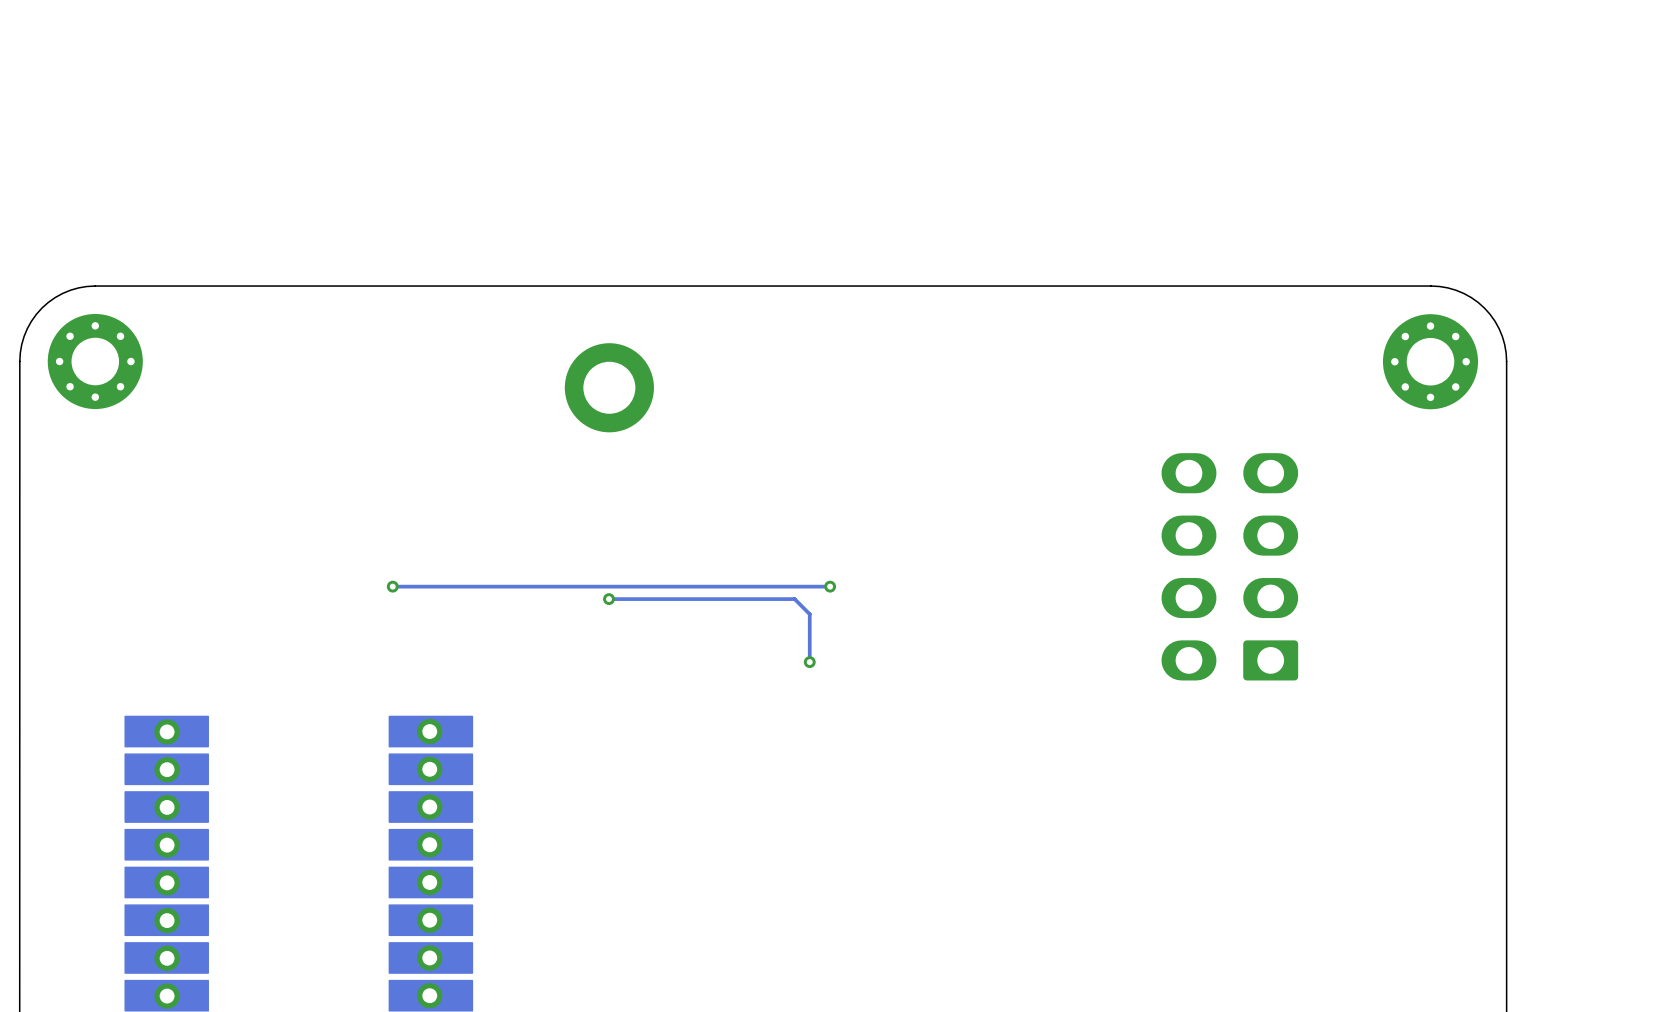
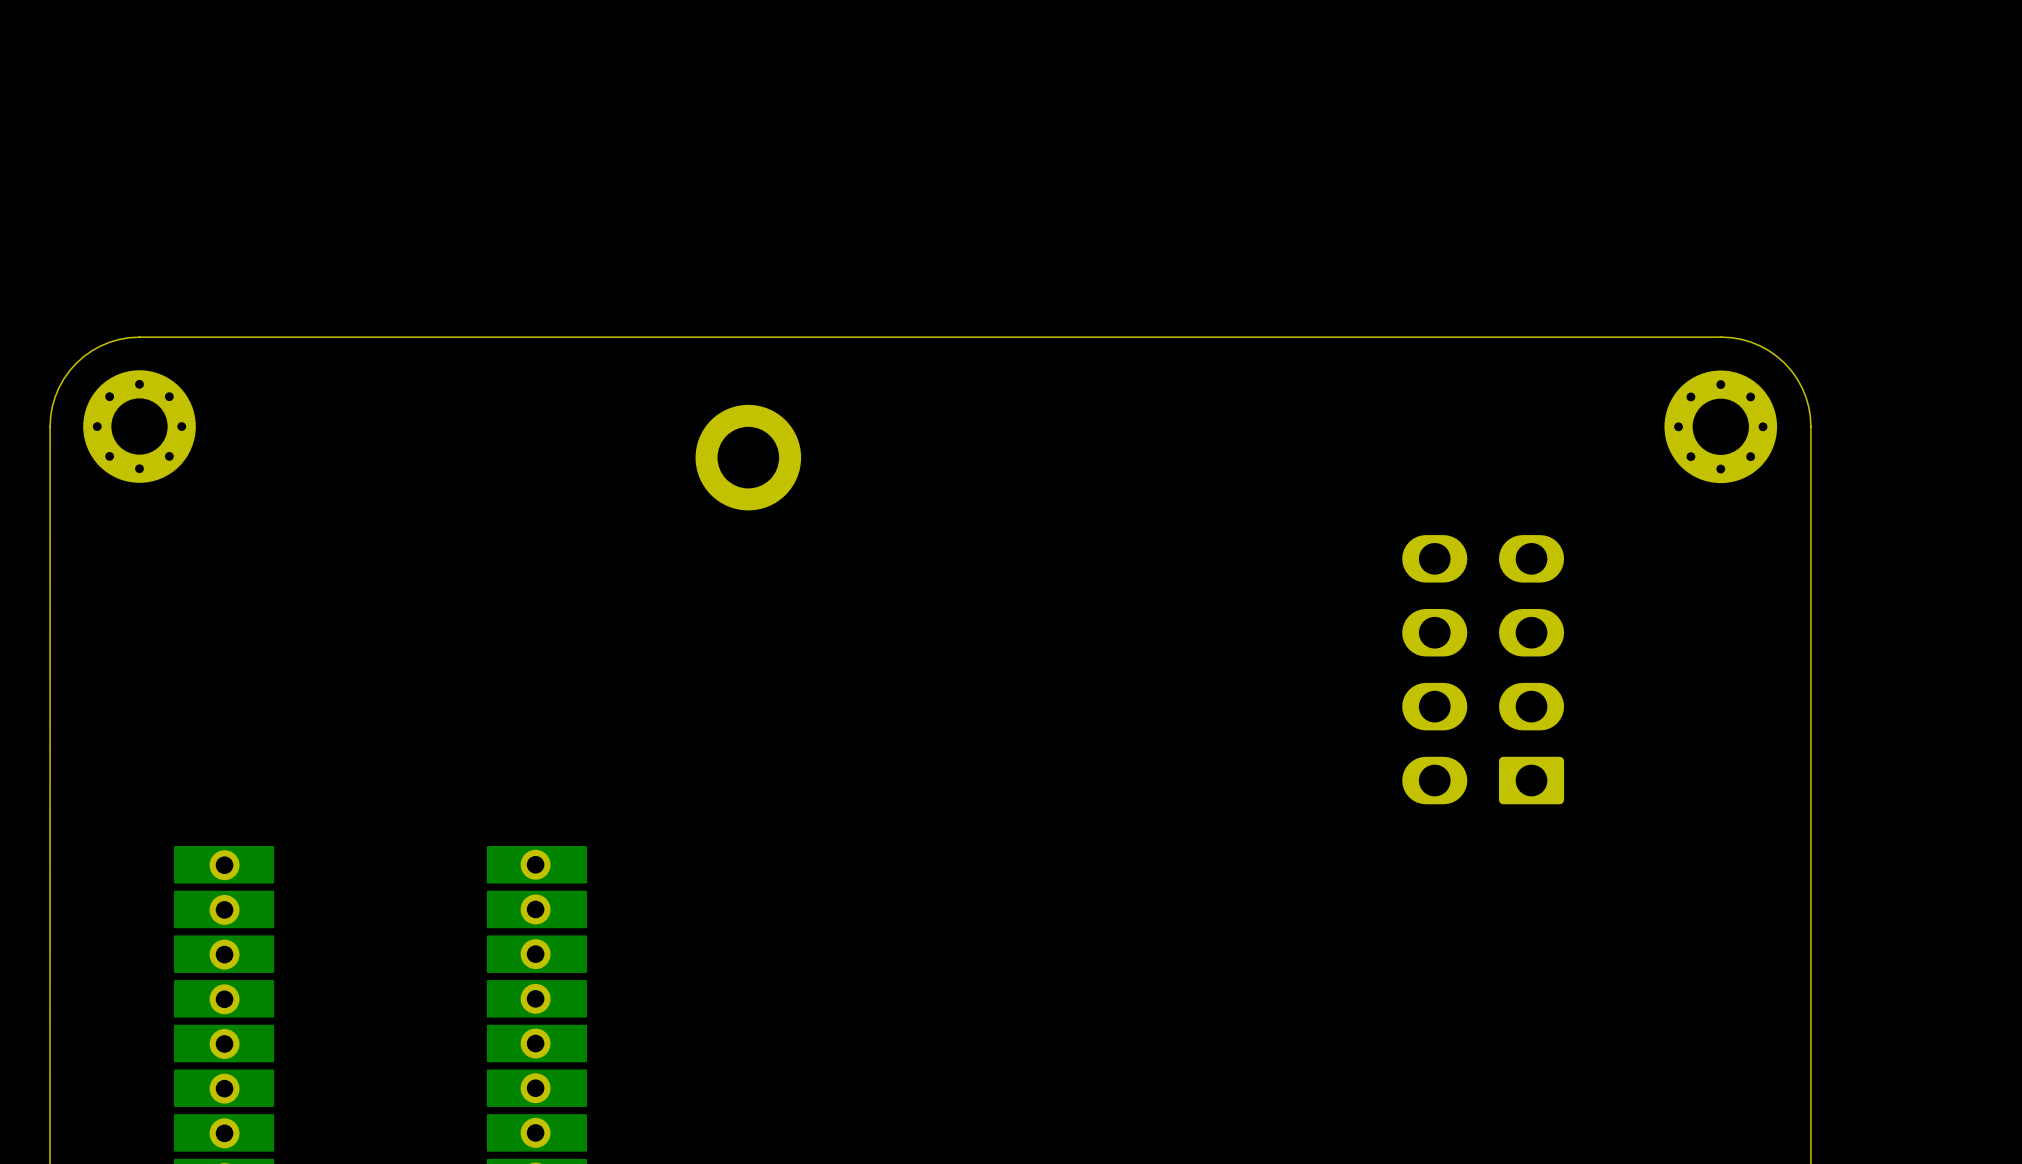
via: (392, 586) -> none
track: (830, 586) (392, 586) -> none
via: (830, 586) -> none
track: (608, 599) (794, 599) (809, 614) (809, 662) -> none
via: (608, 599) -> none
via: (809, 662) -> none

